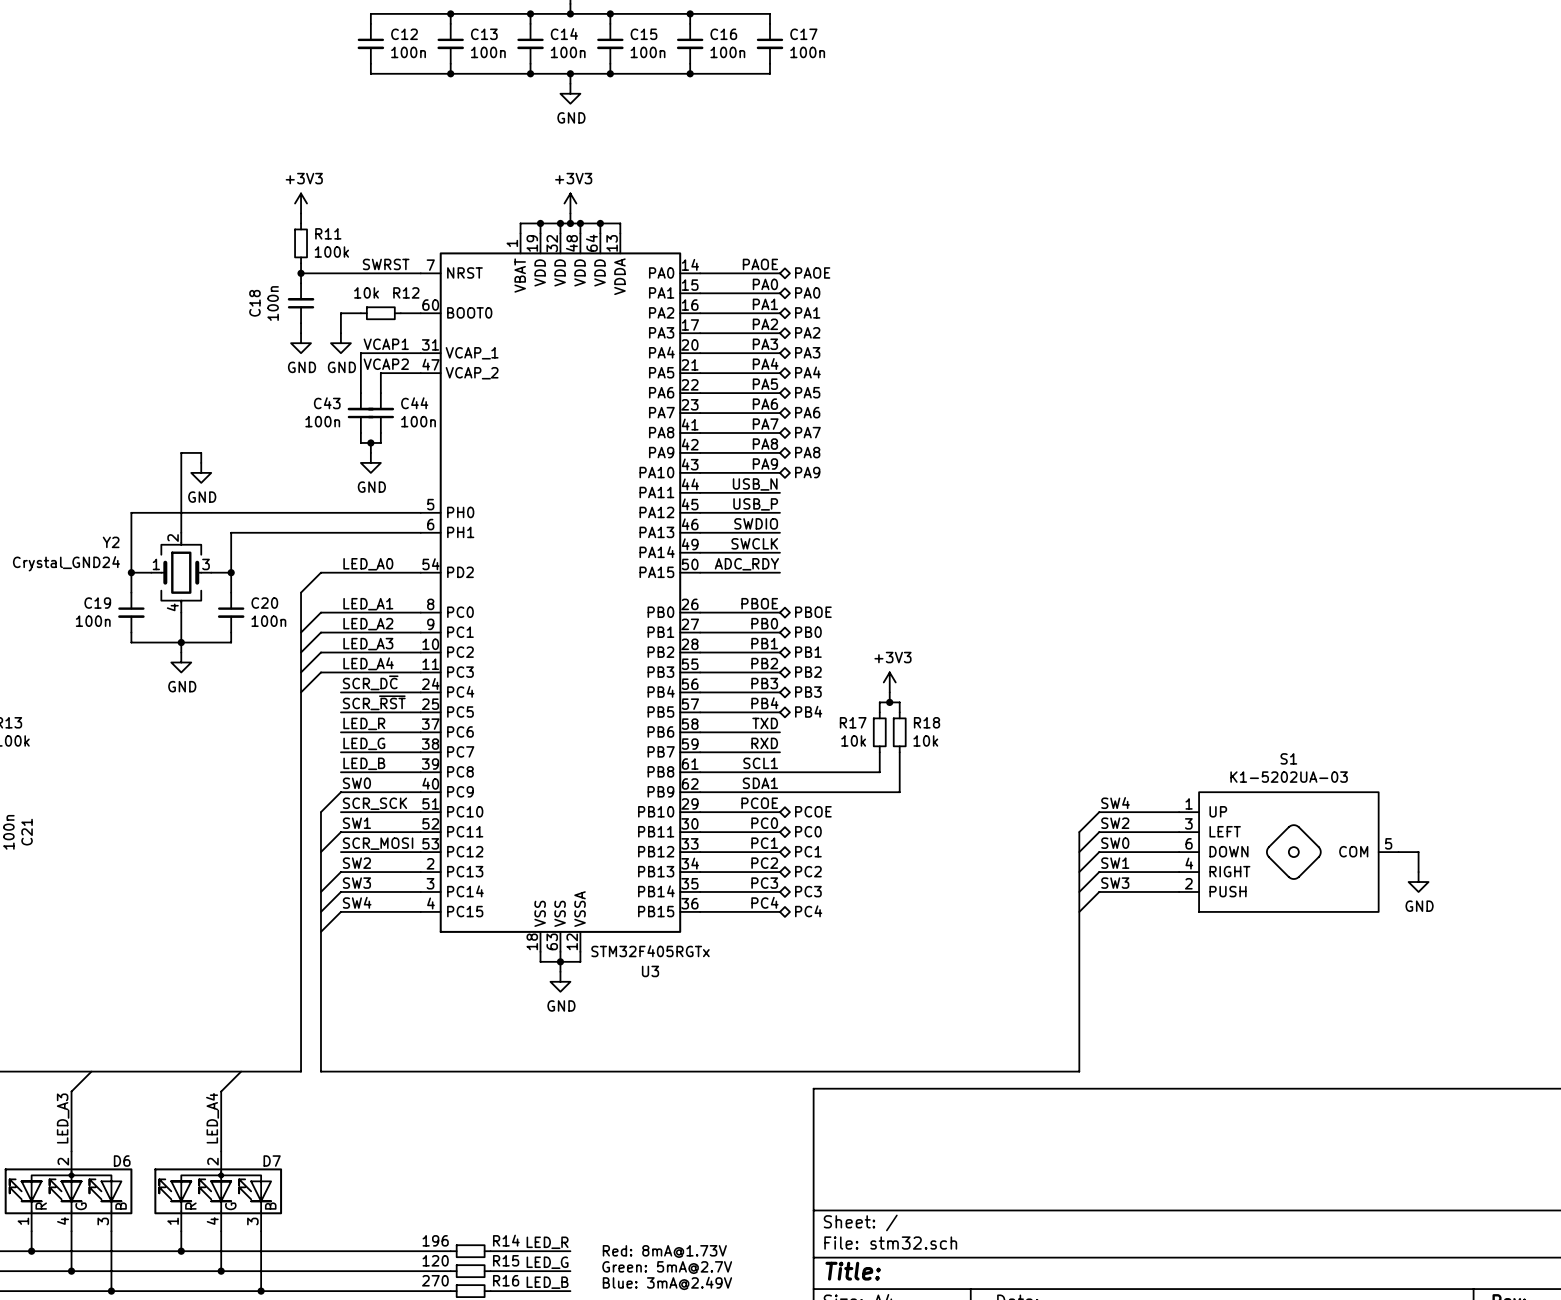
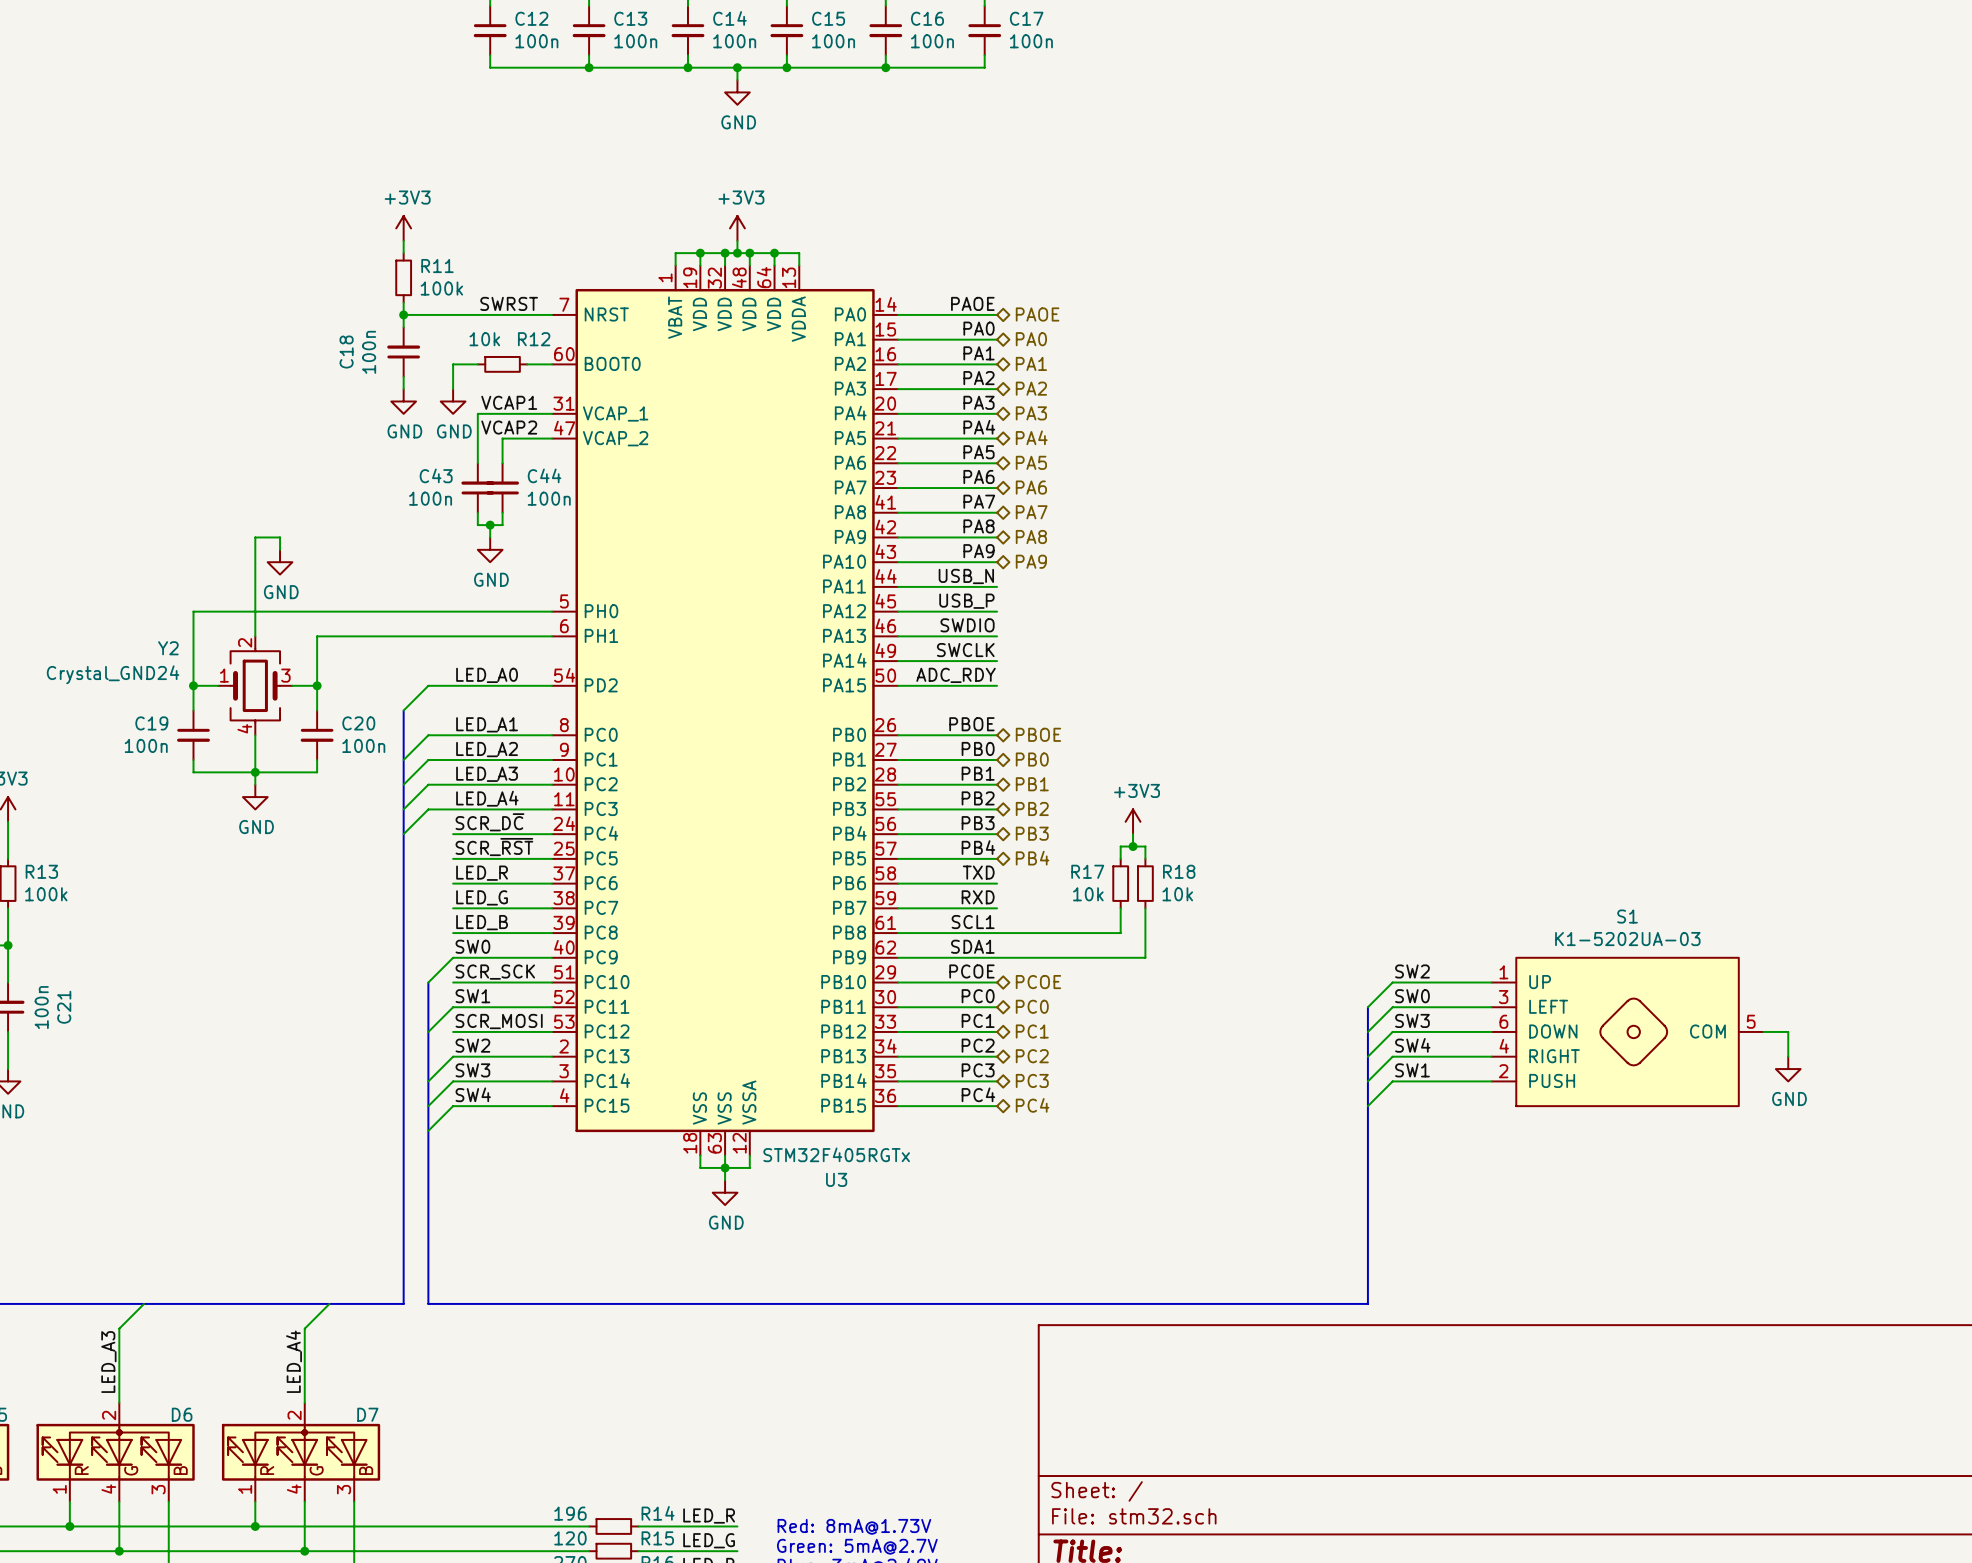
label: SW4 (1115, 803) -> SW2 (1412, 971)
label: SW2 (1115, 823) -> SW0 (1412, 996)
label: SW0 (1115, 843) -> SW3 (1412, 1020)
label: SW1 (1115, 863) -> SW4 (1412, 1045)
label: SW3 (1115, 883) -> SW1 (1412, 1070)

